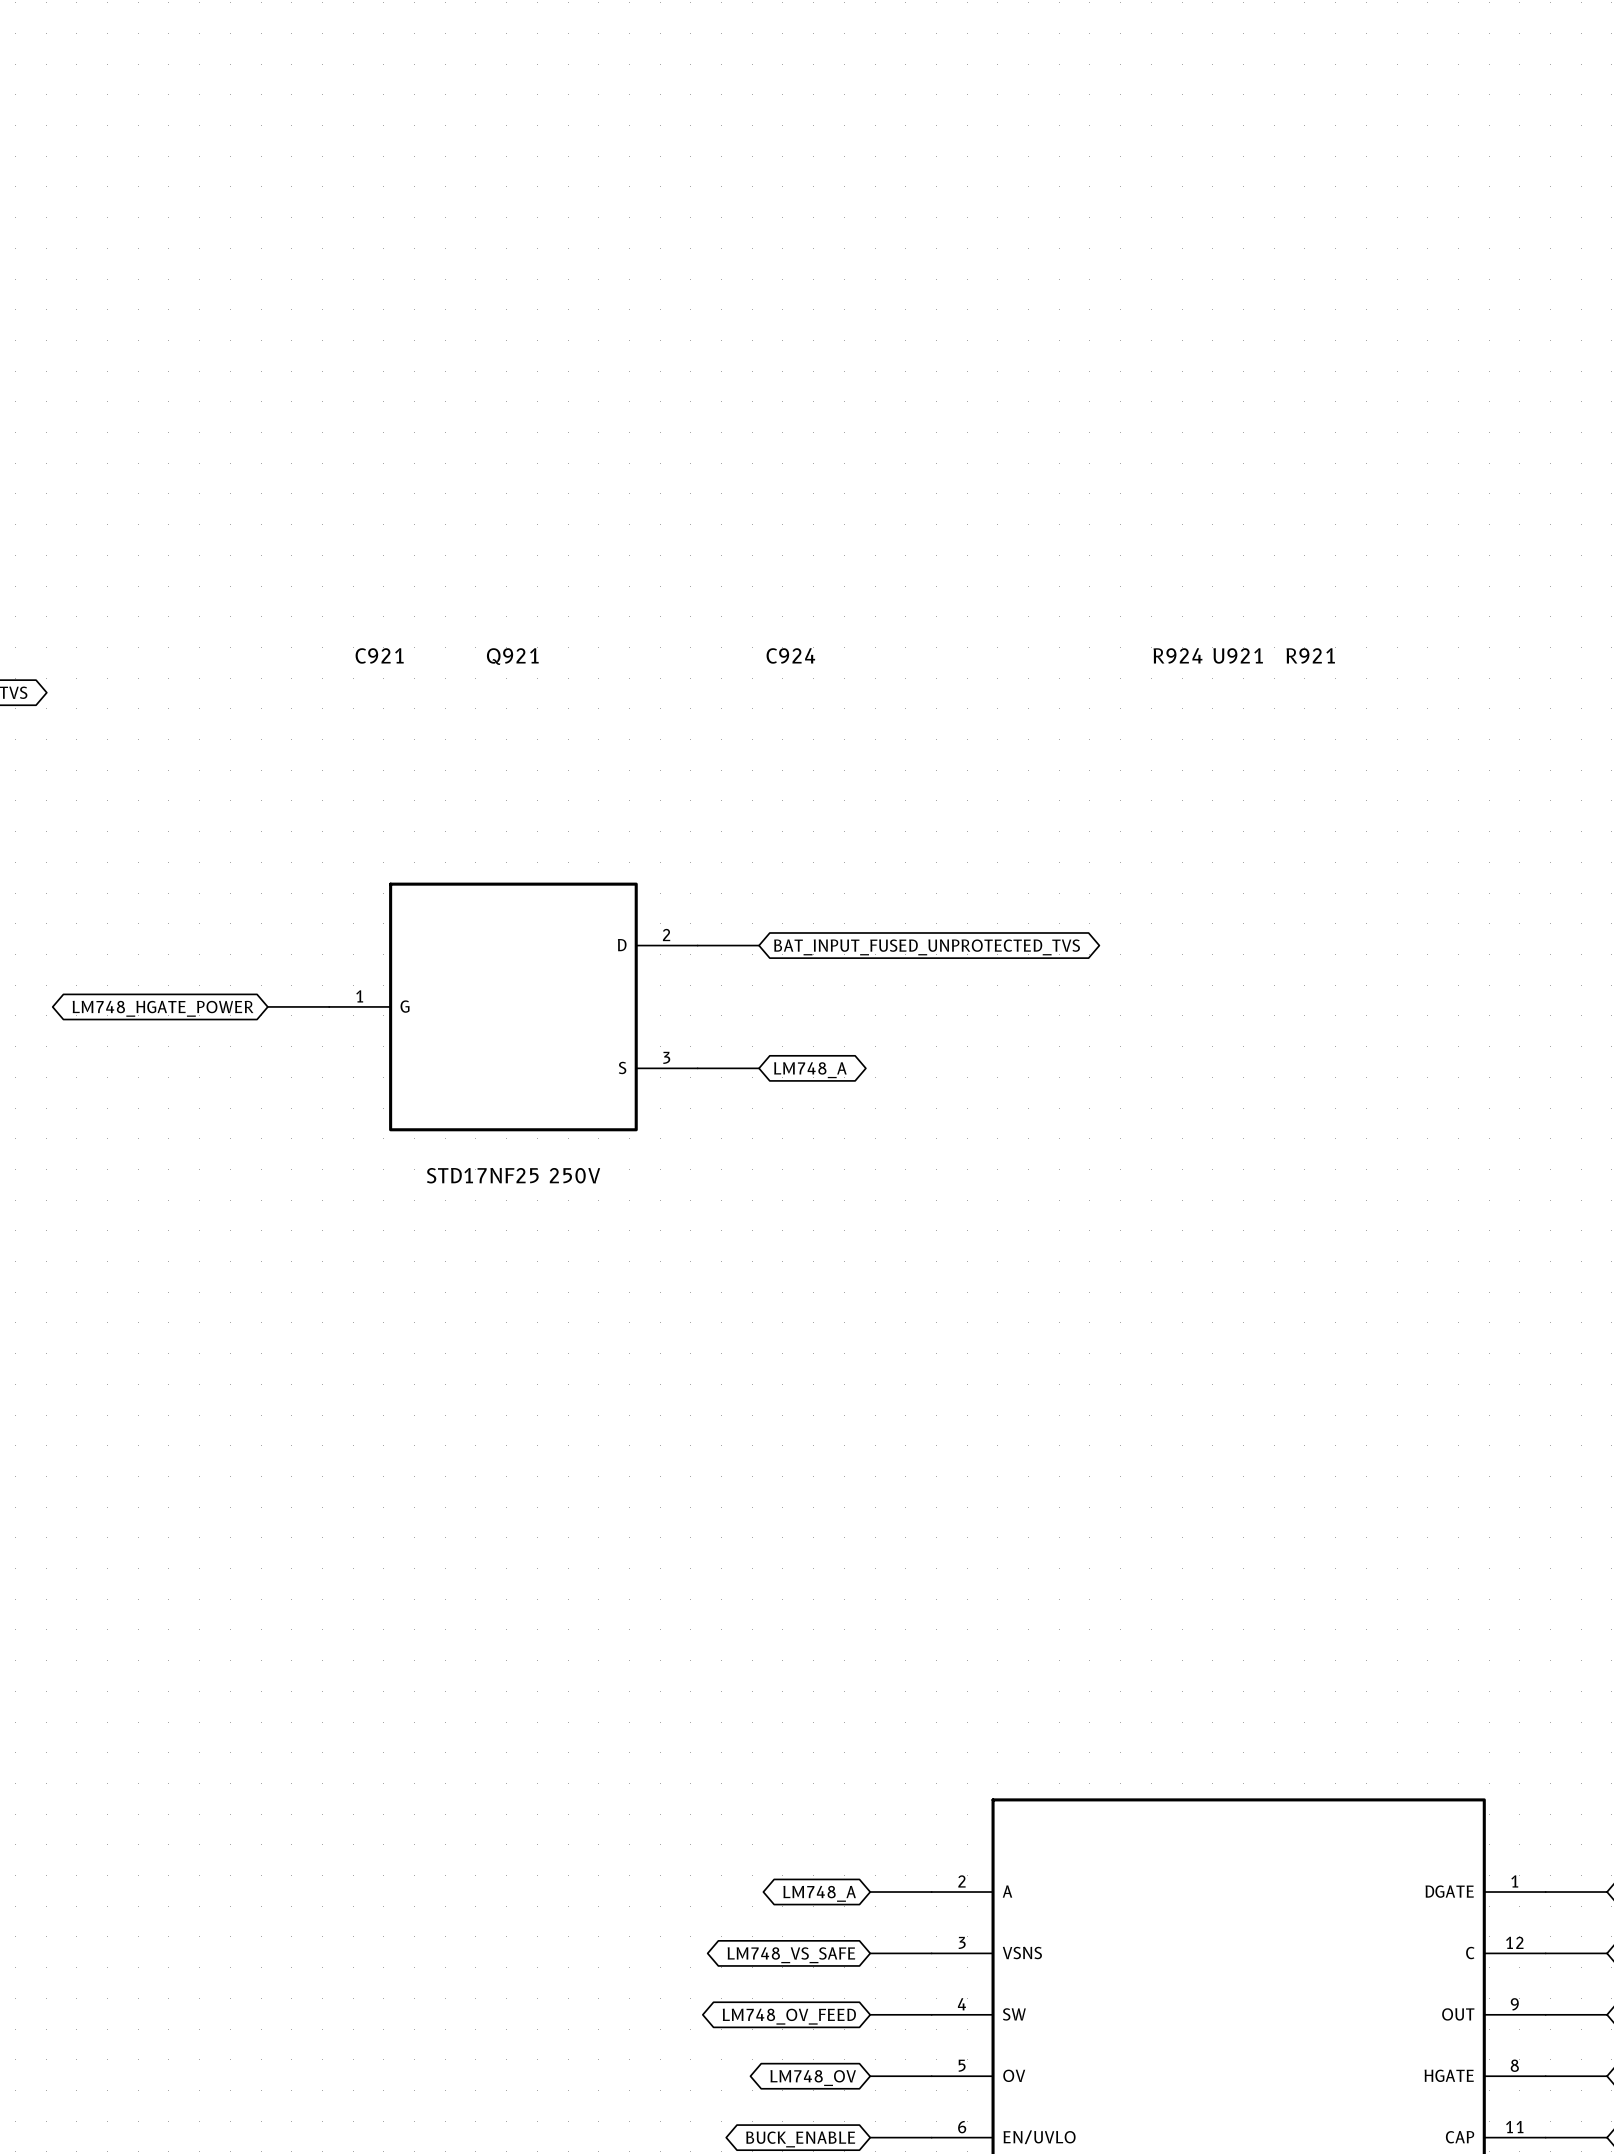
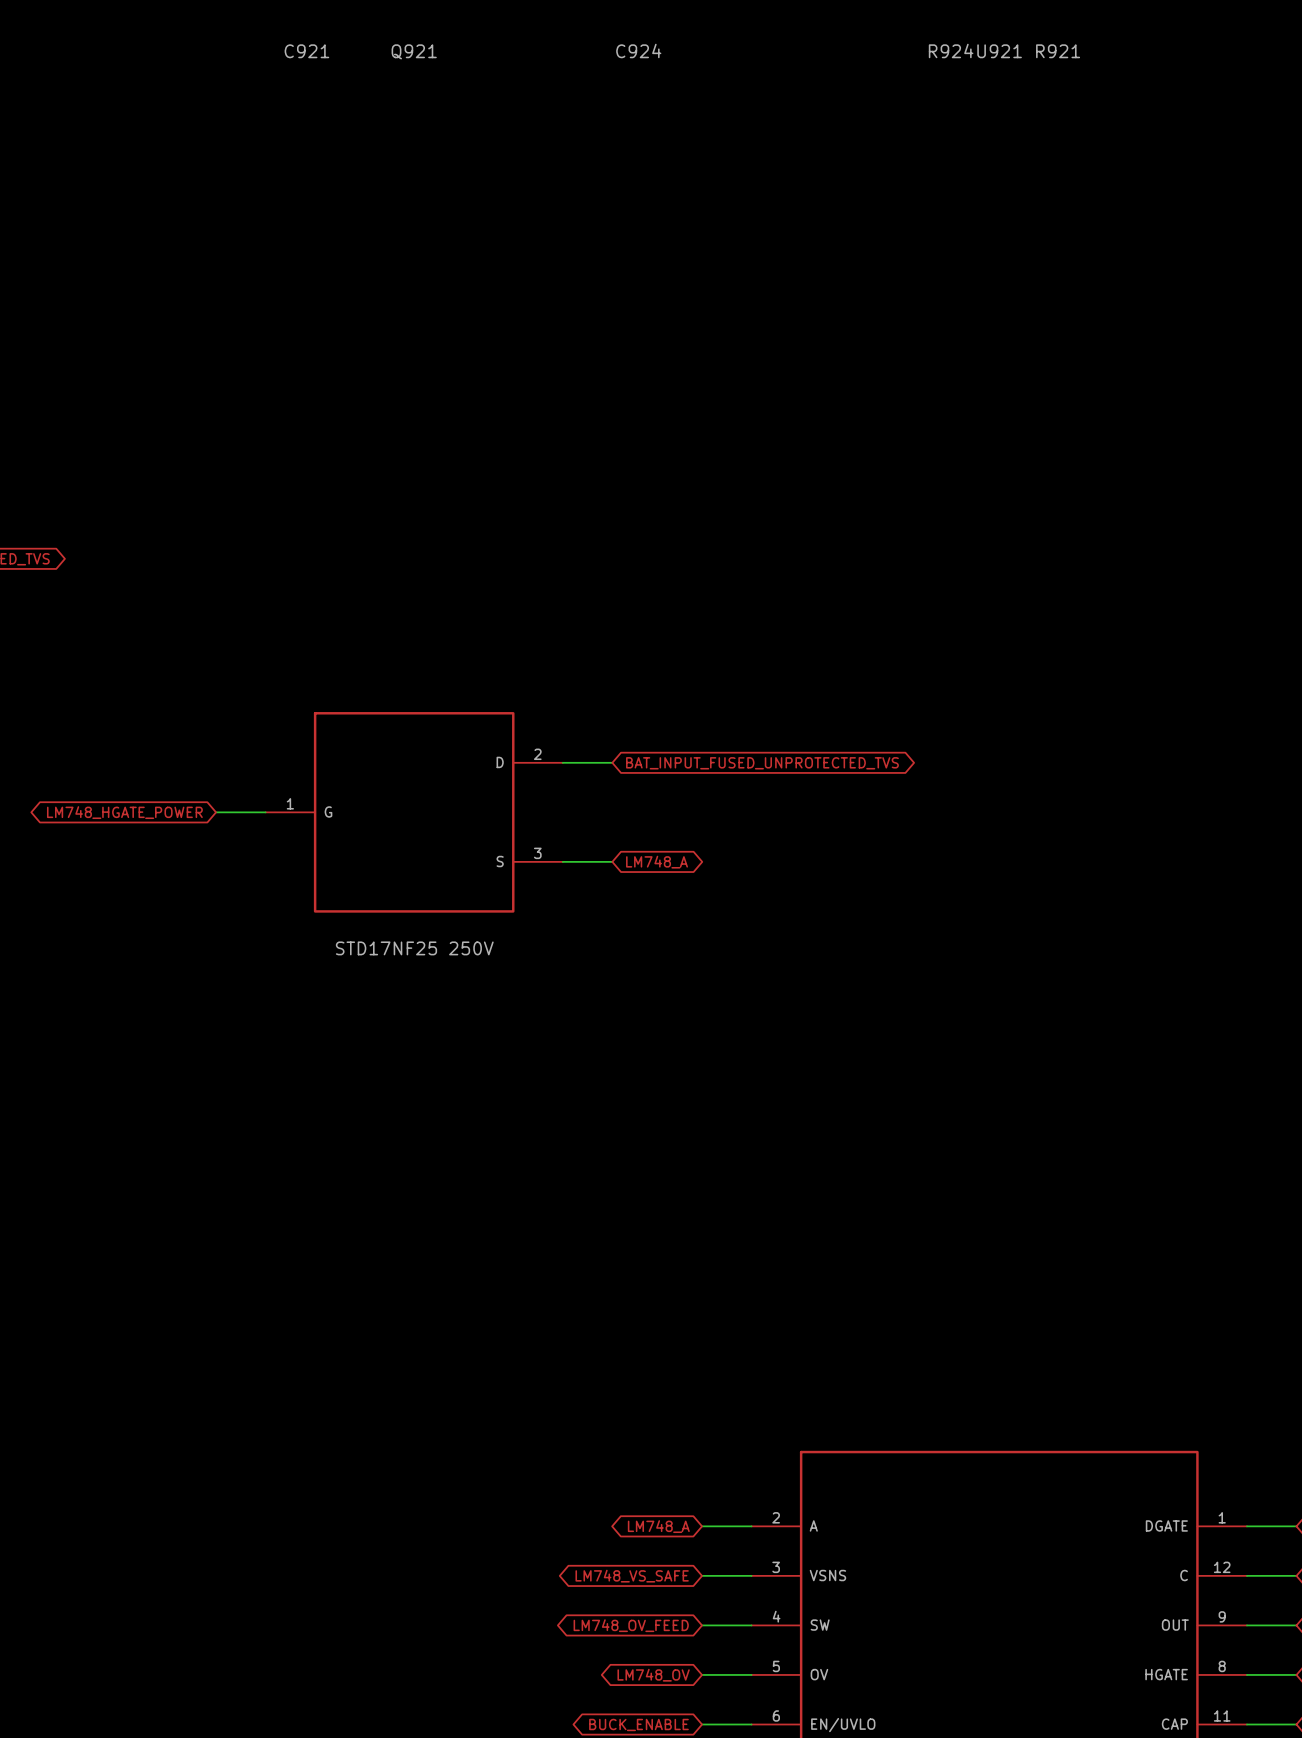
C921 name position: C921 (379, 655) -> C921 (306, 51)
C924 name position: C924 (790, 655) -> C924 (638, 50)
R924 name position: R924 (1178, 655) -> R924 (951, 50)
U921 name position: U921 (1238, 655) -> U921 (999, 51)
R921 name position: R921 (1310, 655) -> R921 (1058, 51)
Q921 name position: Q921 (512, 656) -> Q921 (414, 51)

